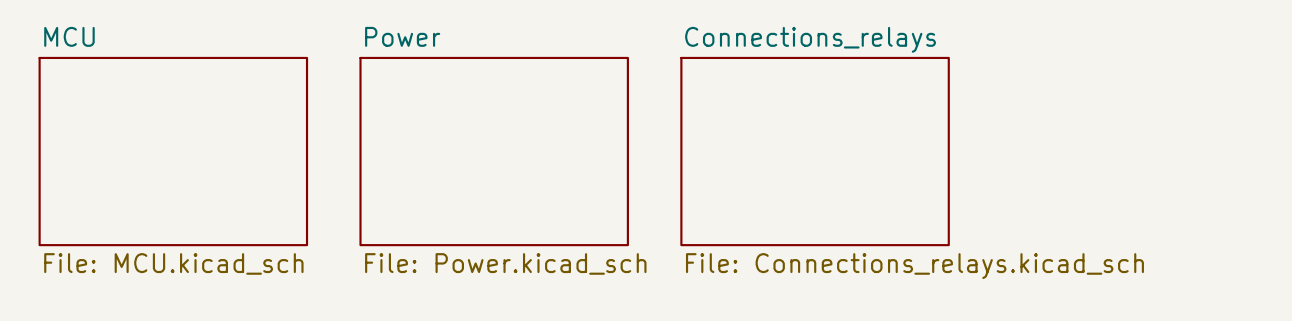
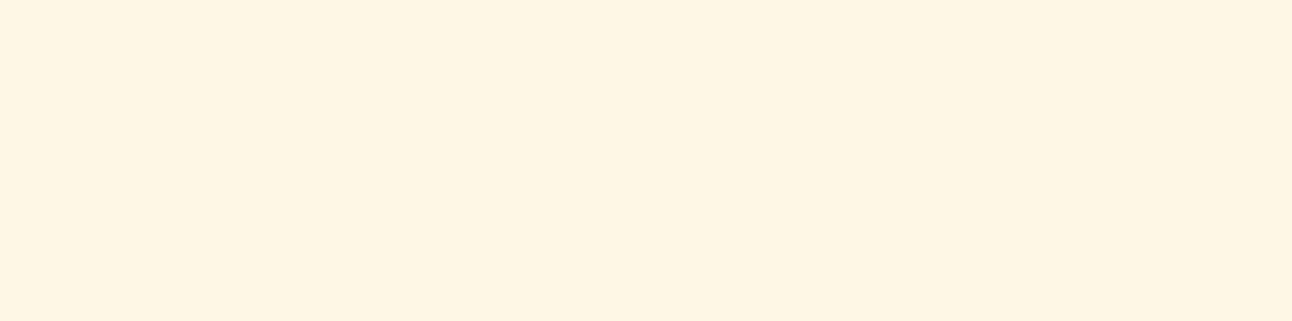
sheet MCU: File: MCU.kicad_sch (173, 151) -> none
sheet Power: File: Power.kicad_sch (494, 151) -> none
sheet Connections_relays: File: Connections_relays.kicad_sch (815, 151) -> none

